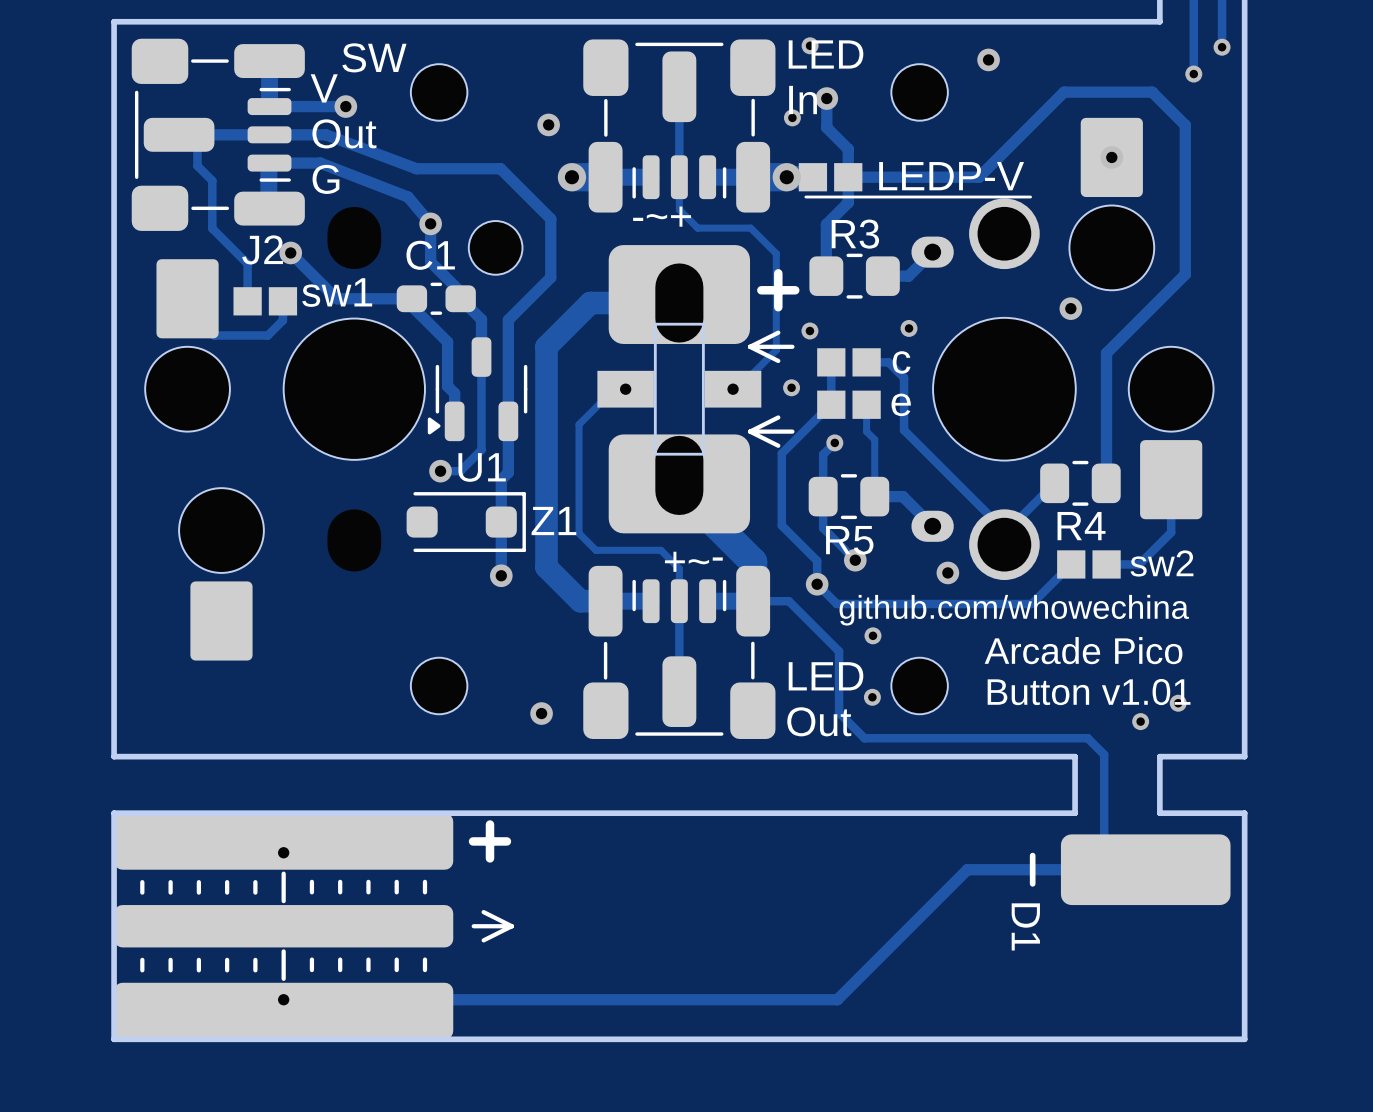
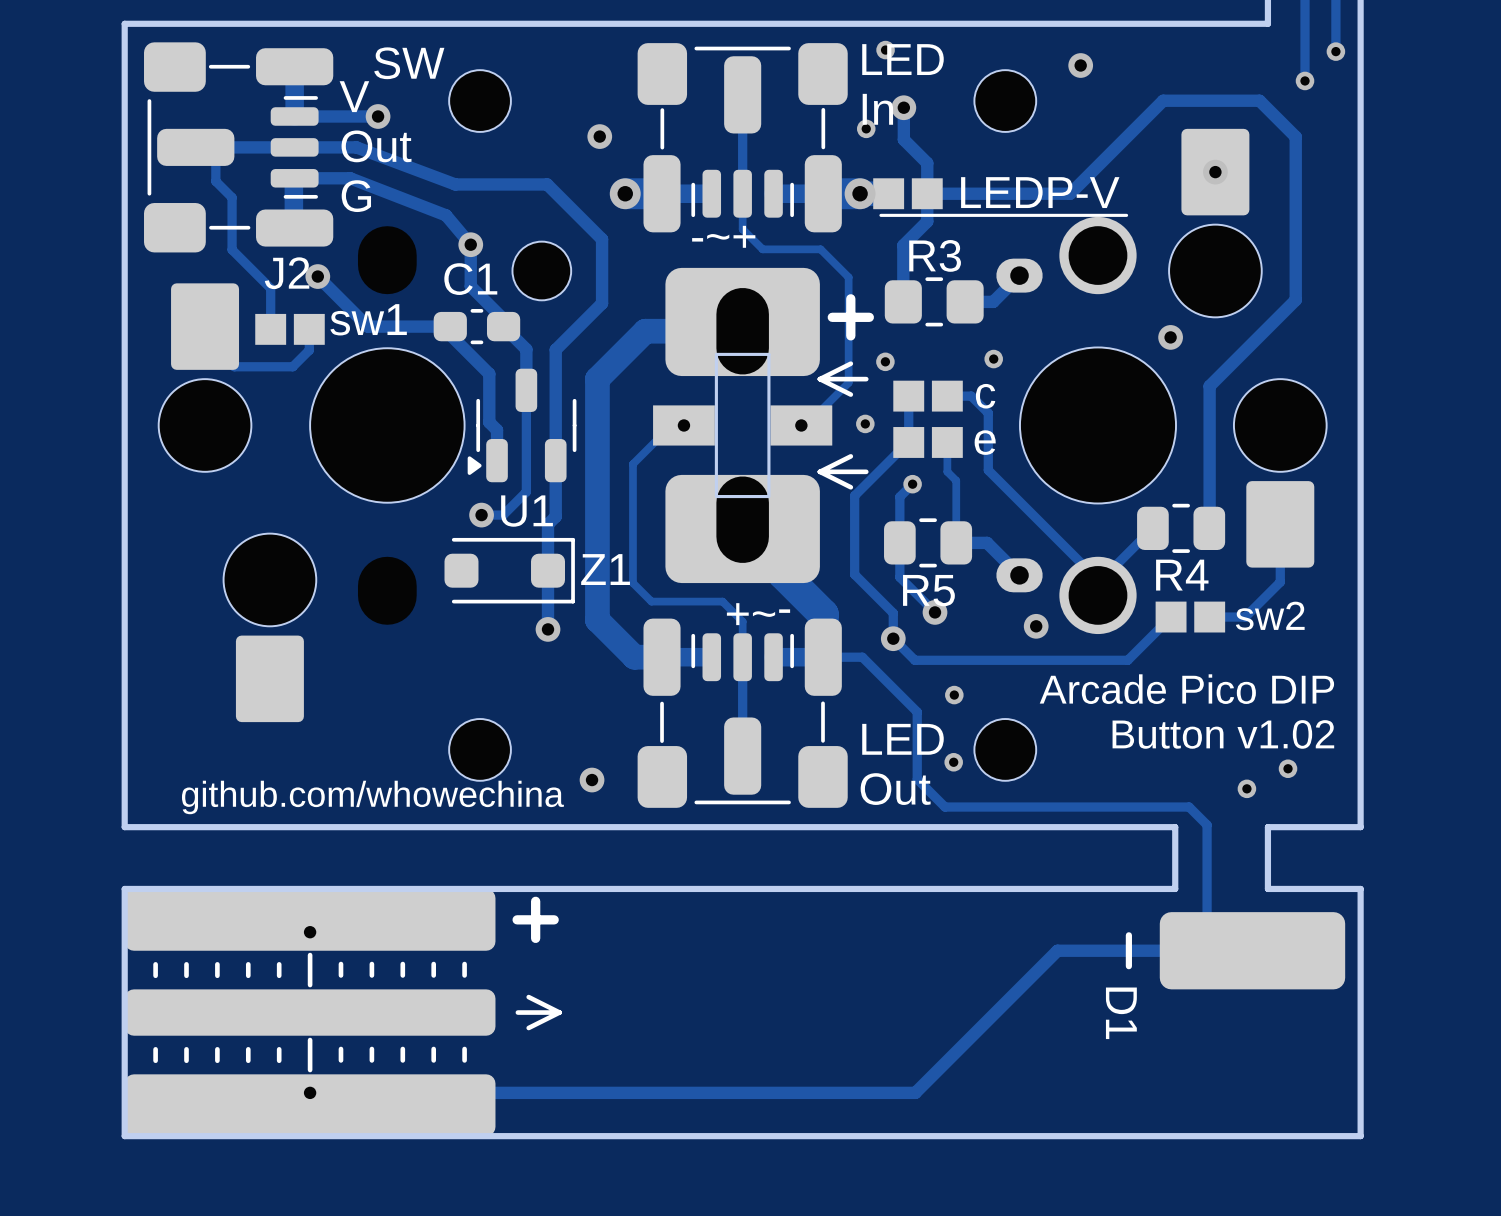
part footprint: [145, 206, 523, 661] -> [158, 226, 572, 723]
text position: github.com/whowechina (1014, 610) -> github.com/whowechina (372, 797)
text: Arcade Pico (1083, 650) -> Arcade Pico DIP (1186, 689)
text: Button v1.01 (1089, 692) -> Button v1.02 (1223, 734)

